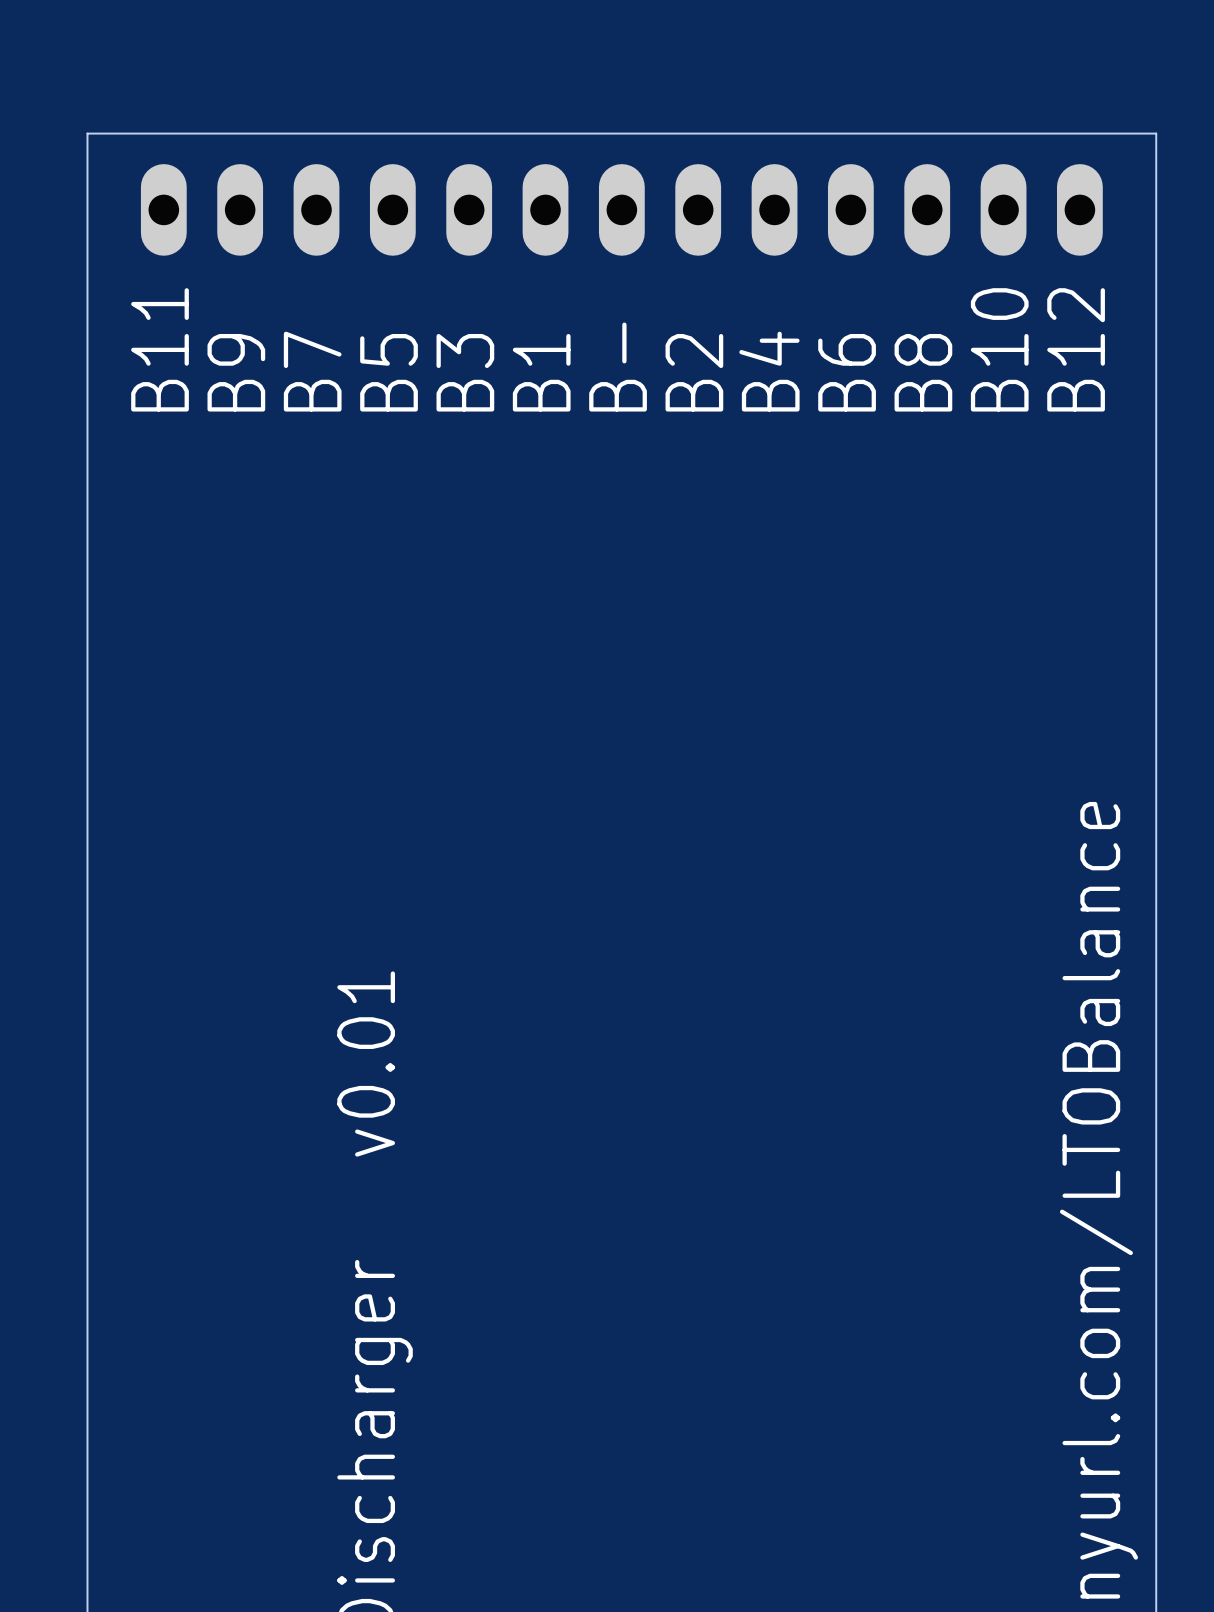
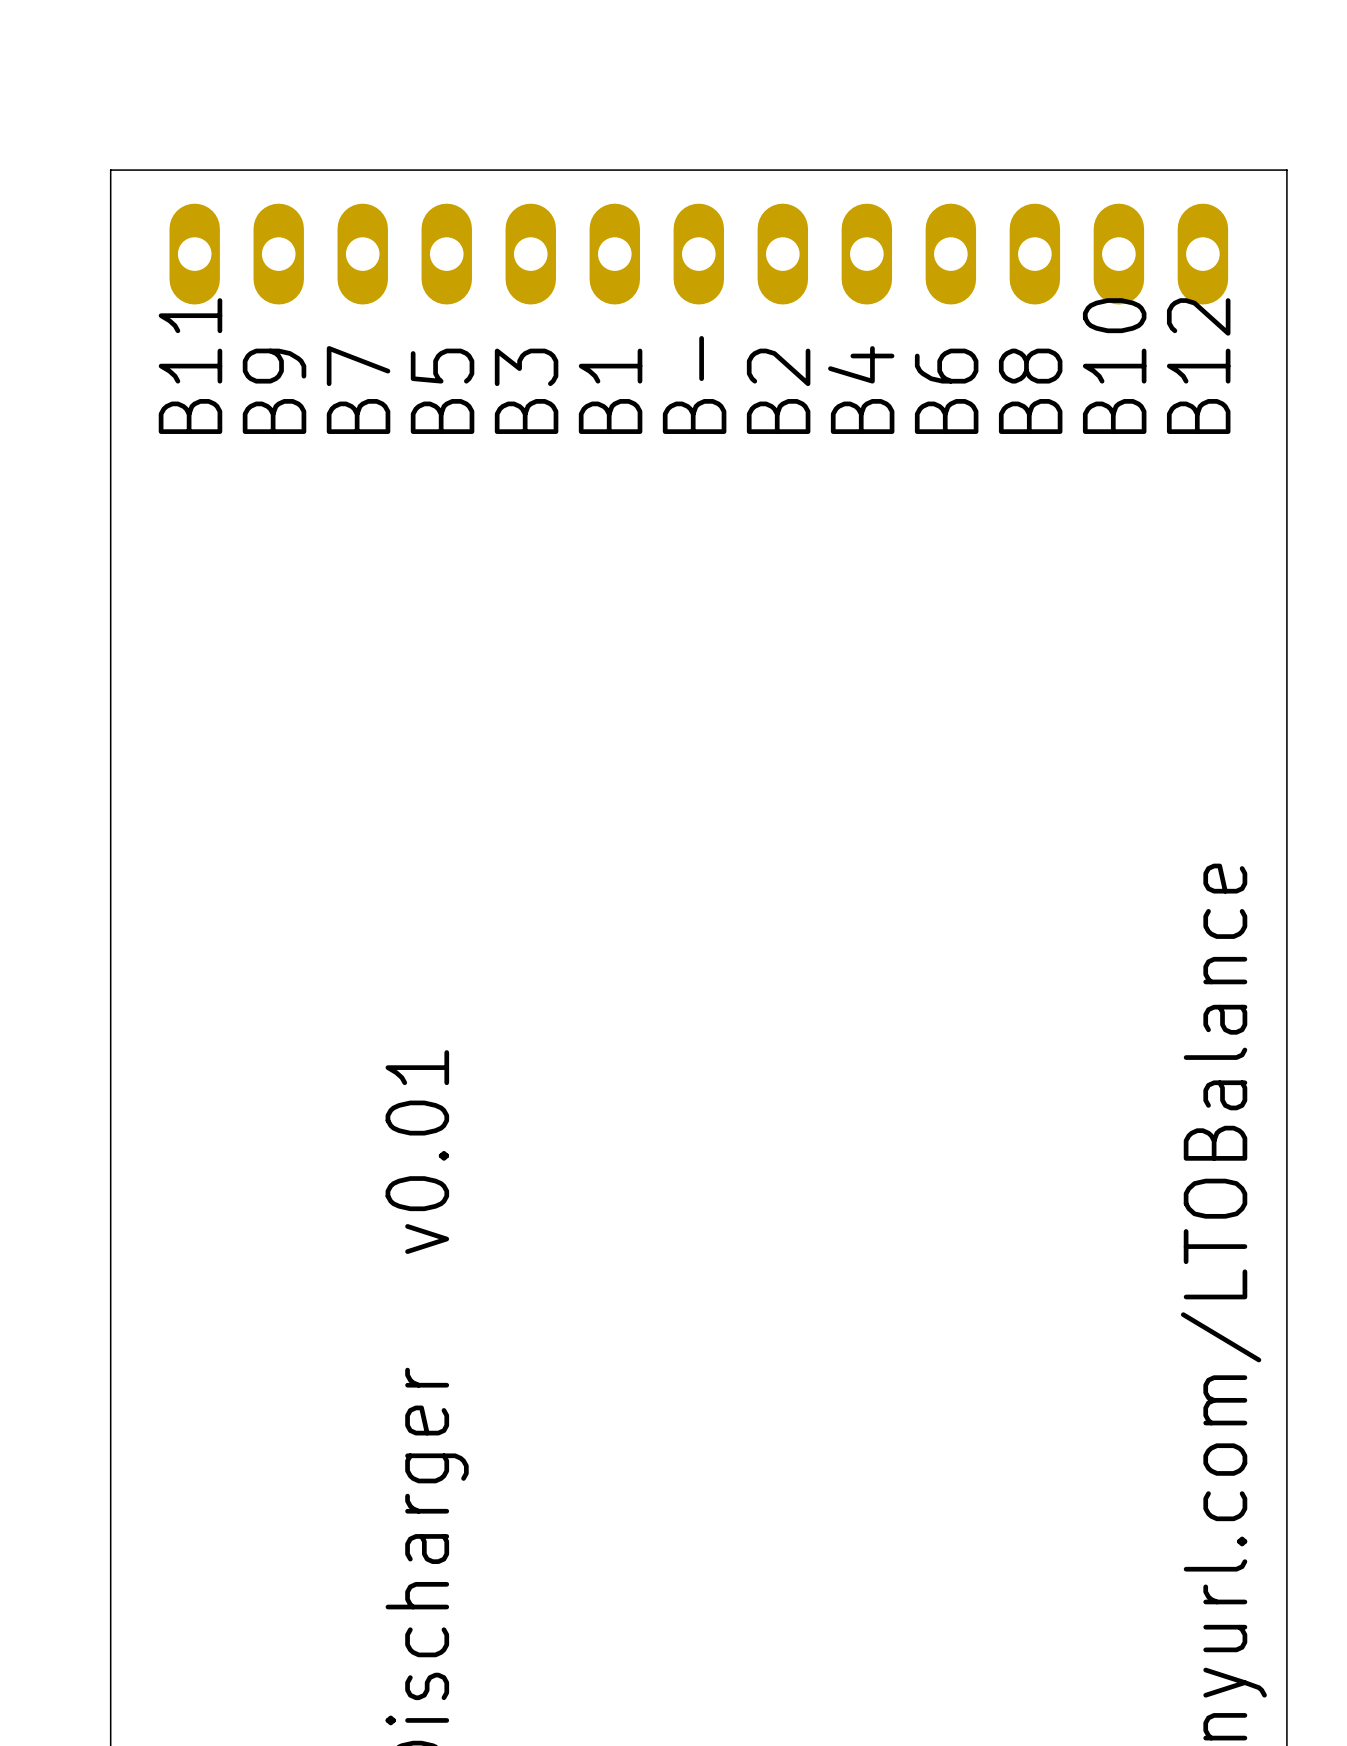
board edge: (1156, 171) (1156, 133) (87, 133) (87, 171) -> (1286, 170) (110, 170)
part position: (621, 209) -> (698, 254)

